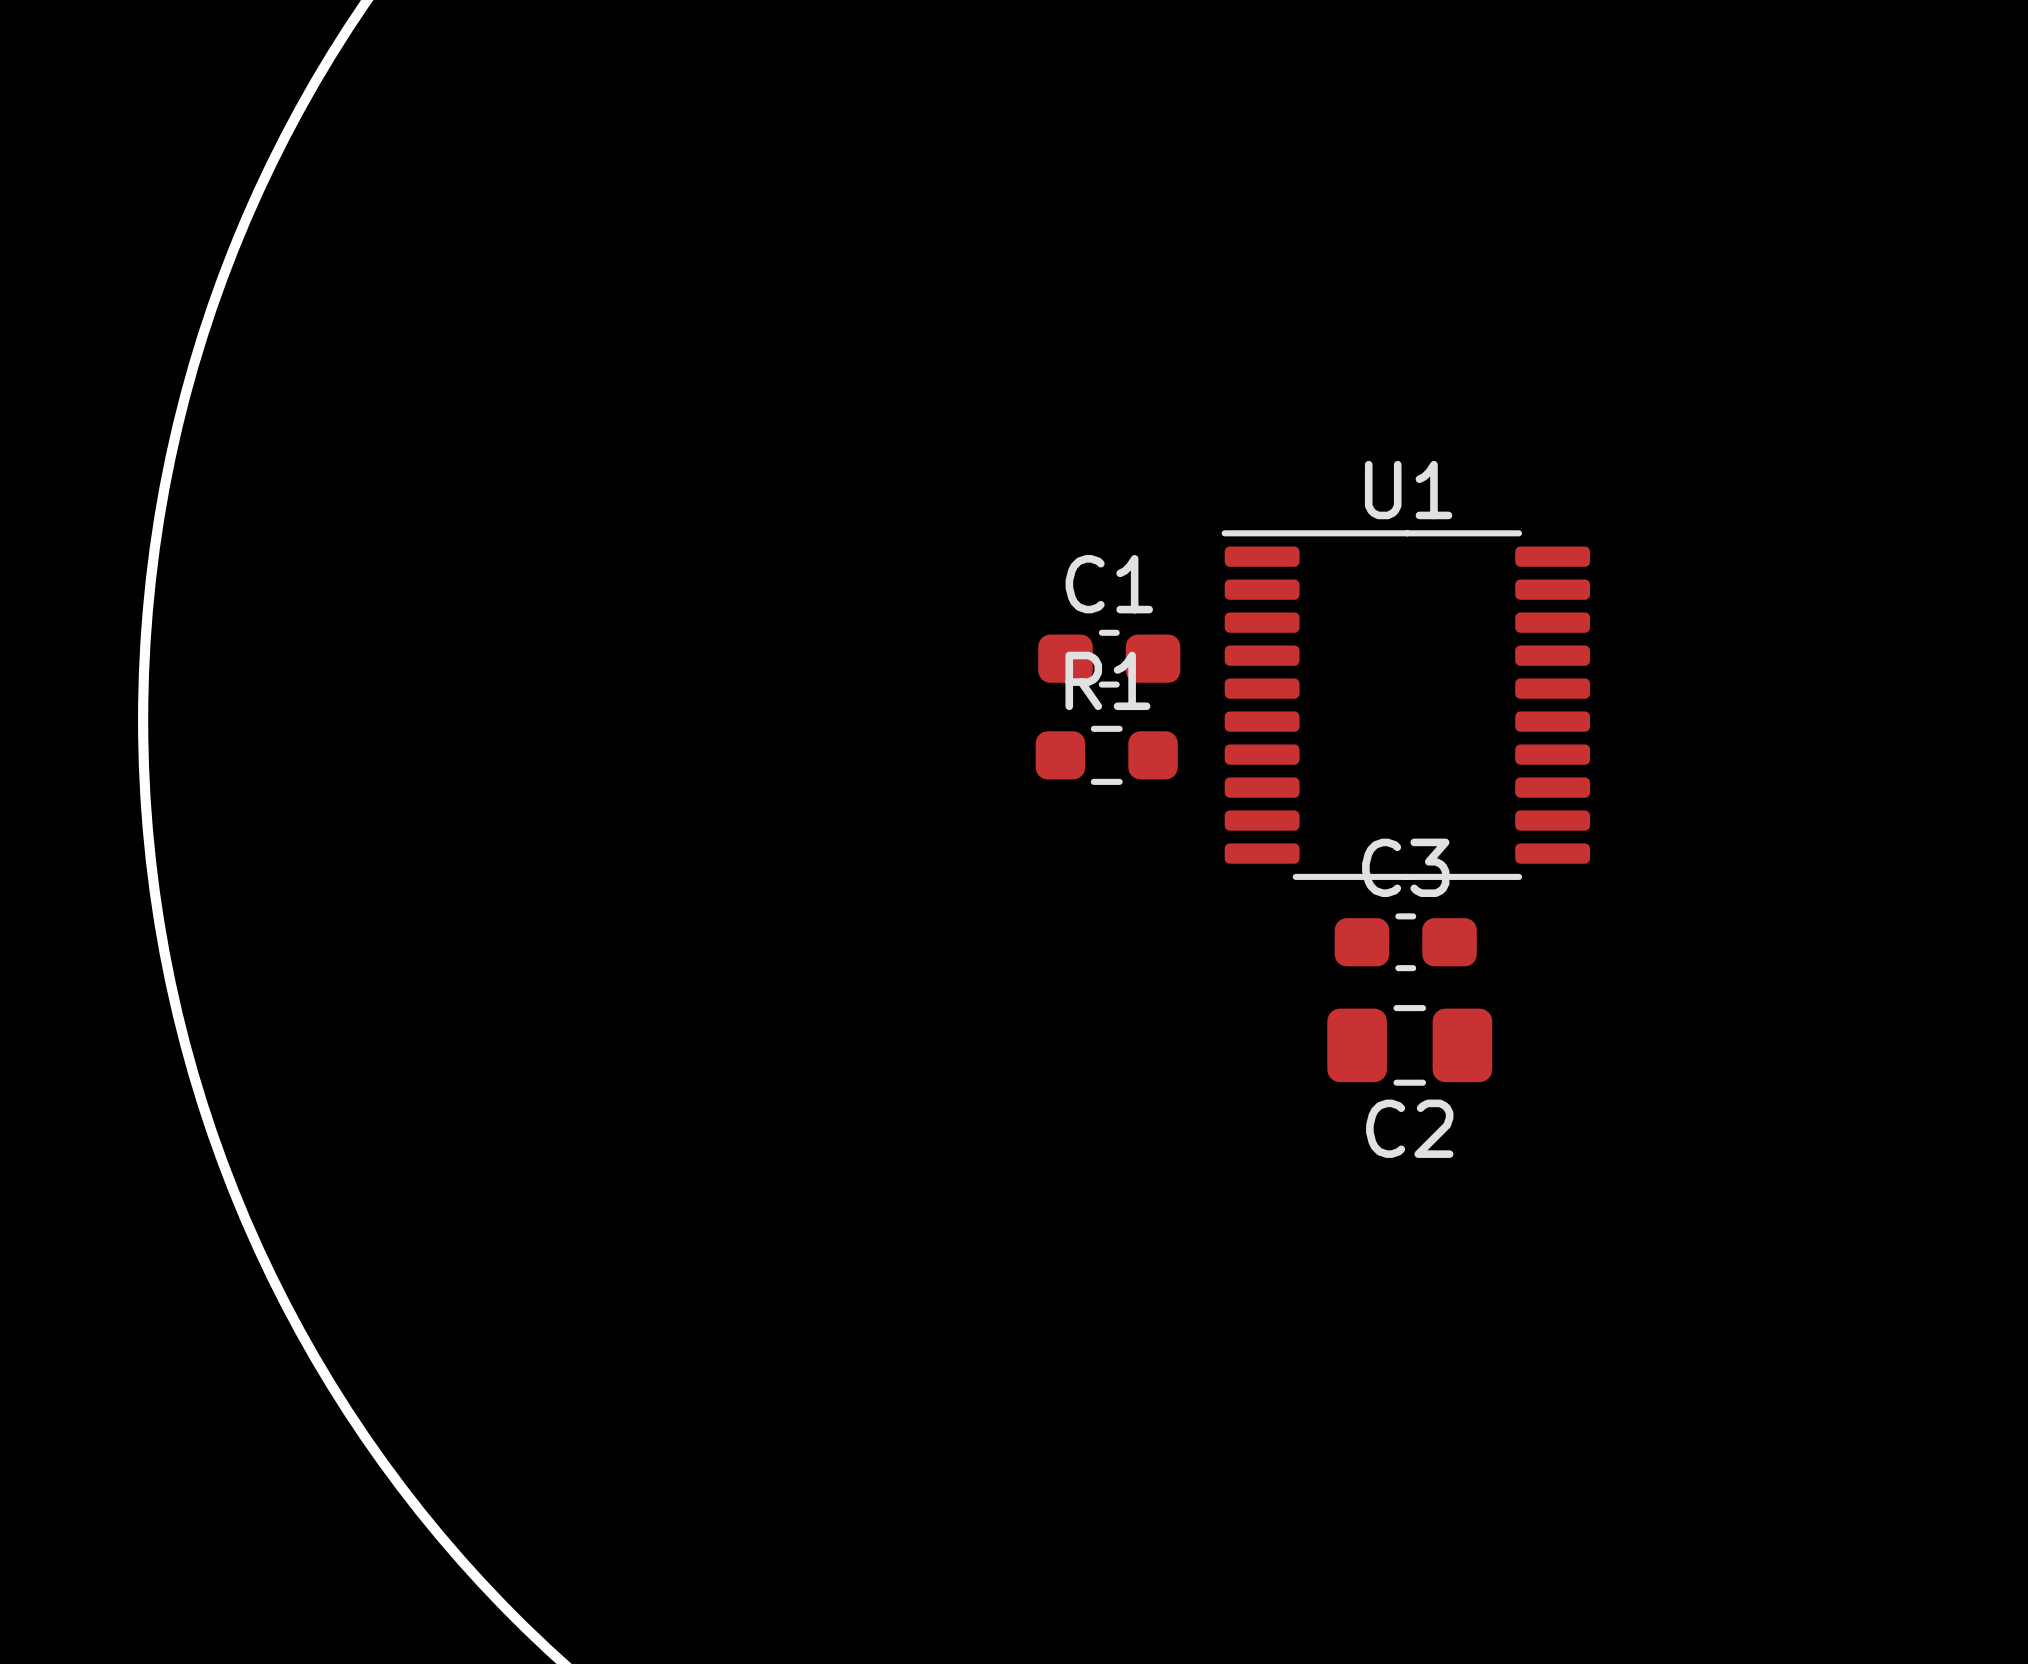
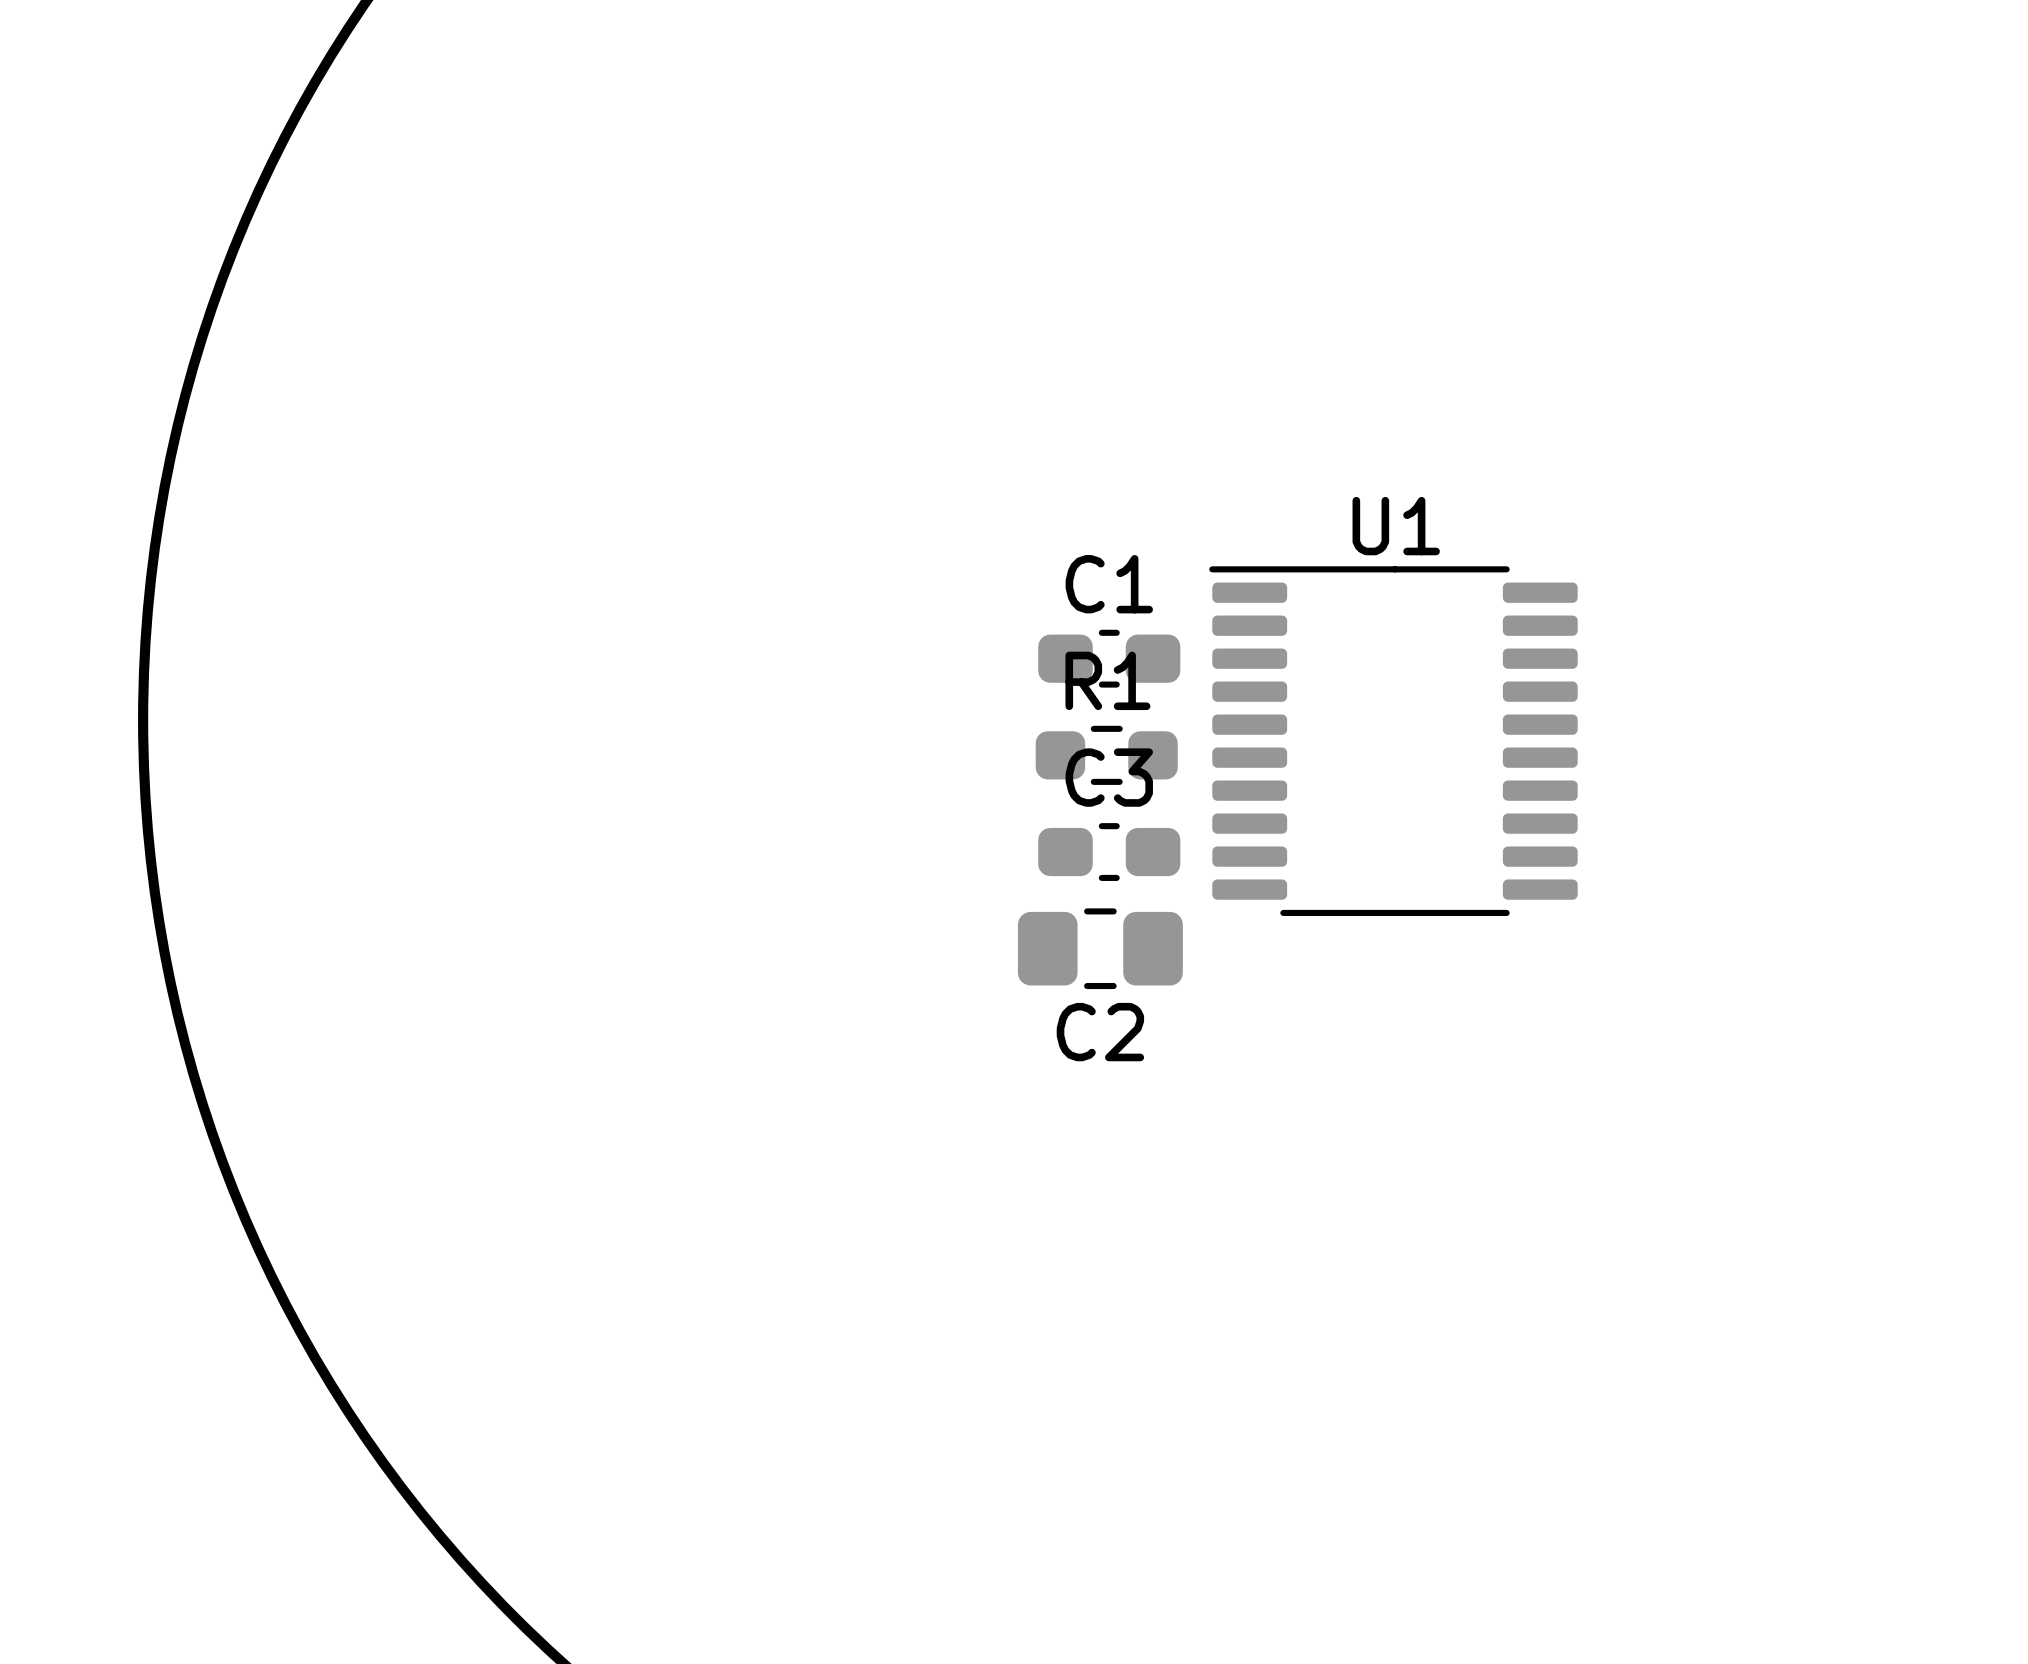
U1 position: (1405, 705) -> (1393, 741)
C3 position: (1405, 942) -> (1109, 852)
C2 position: (1409, 1045) -> (1100, 948)

